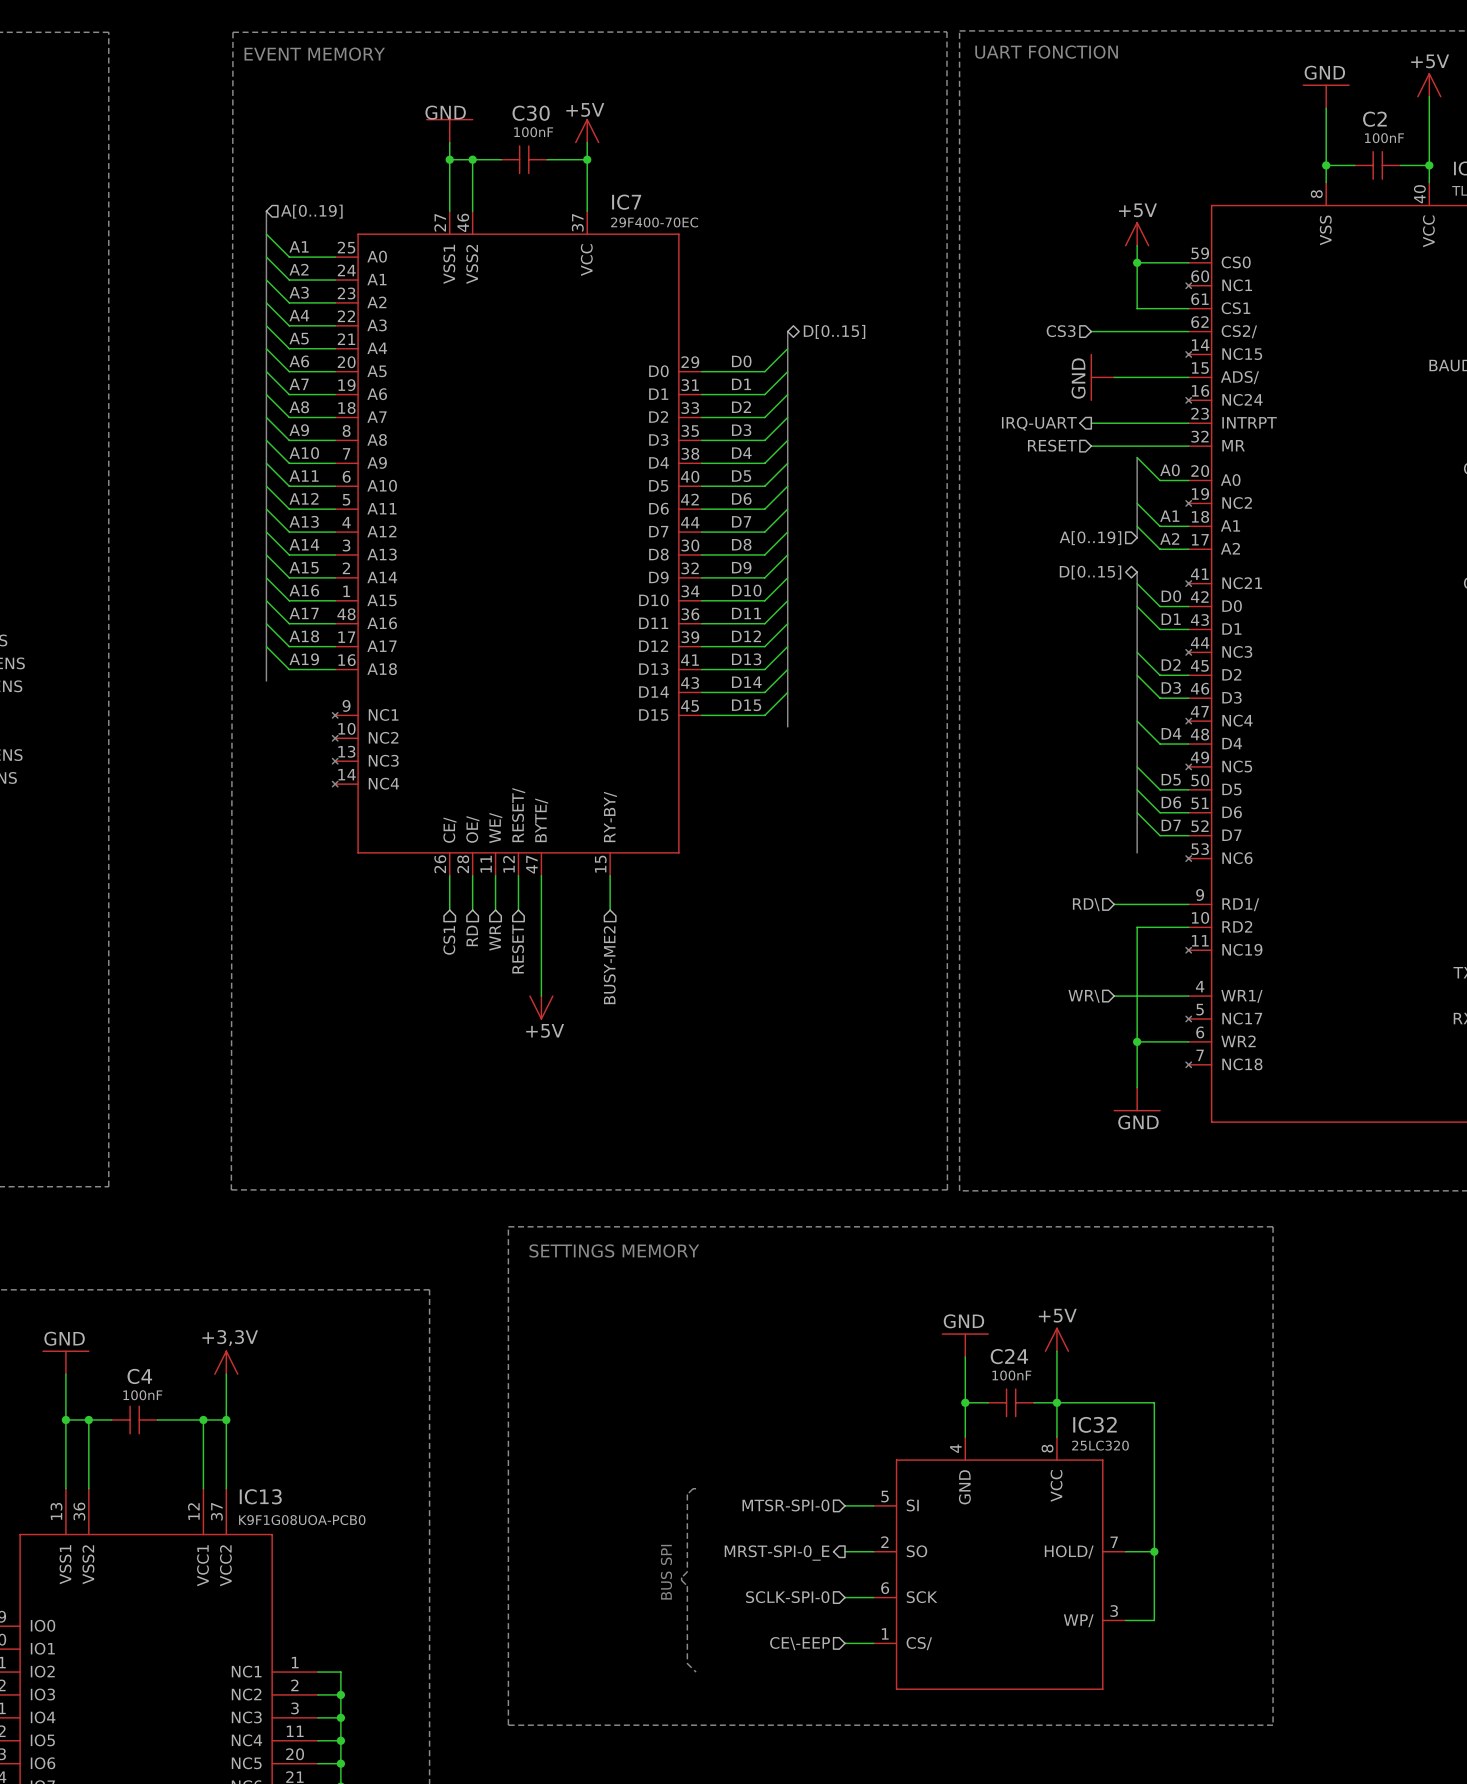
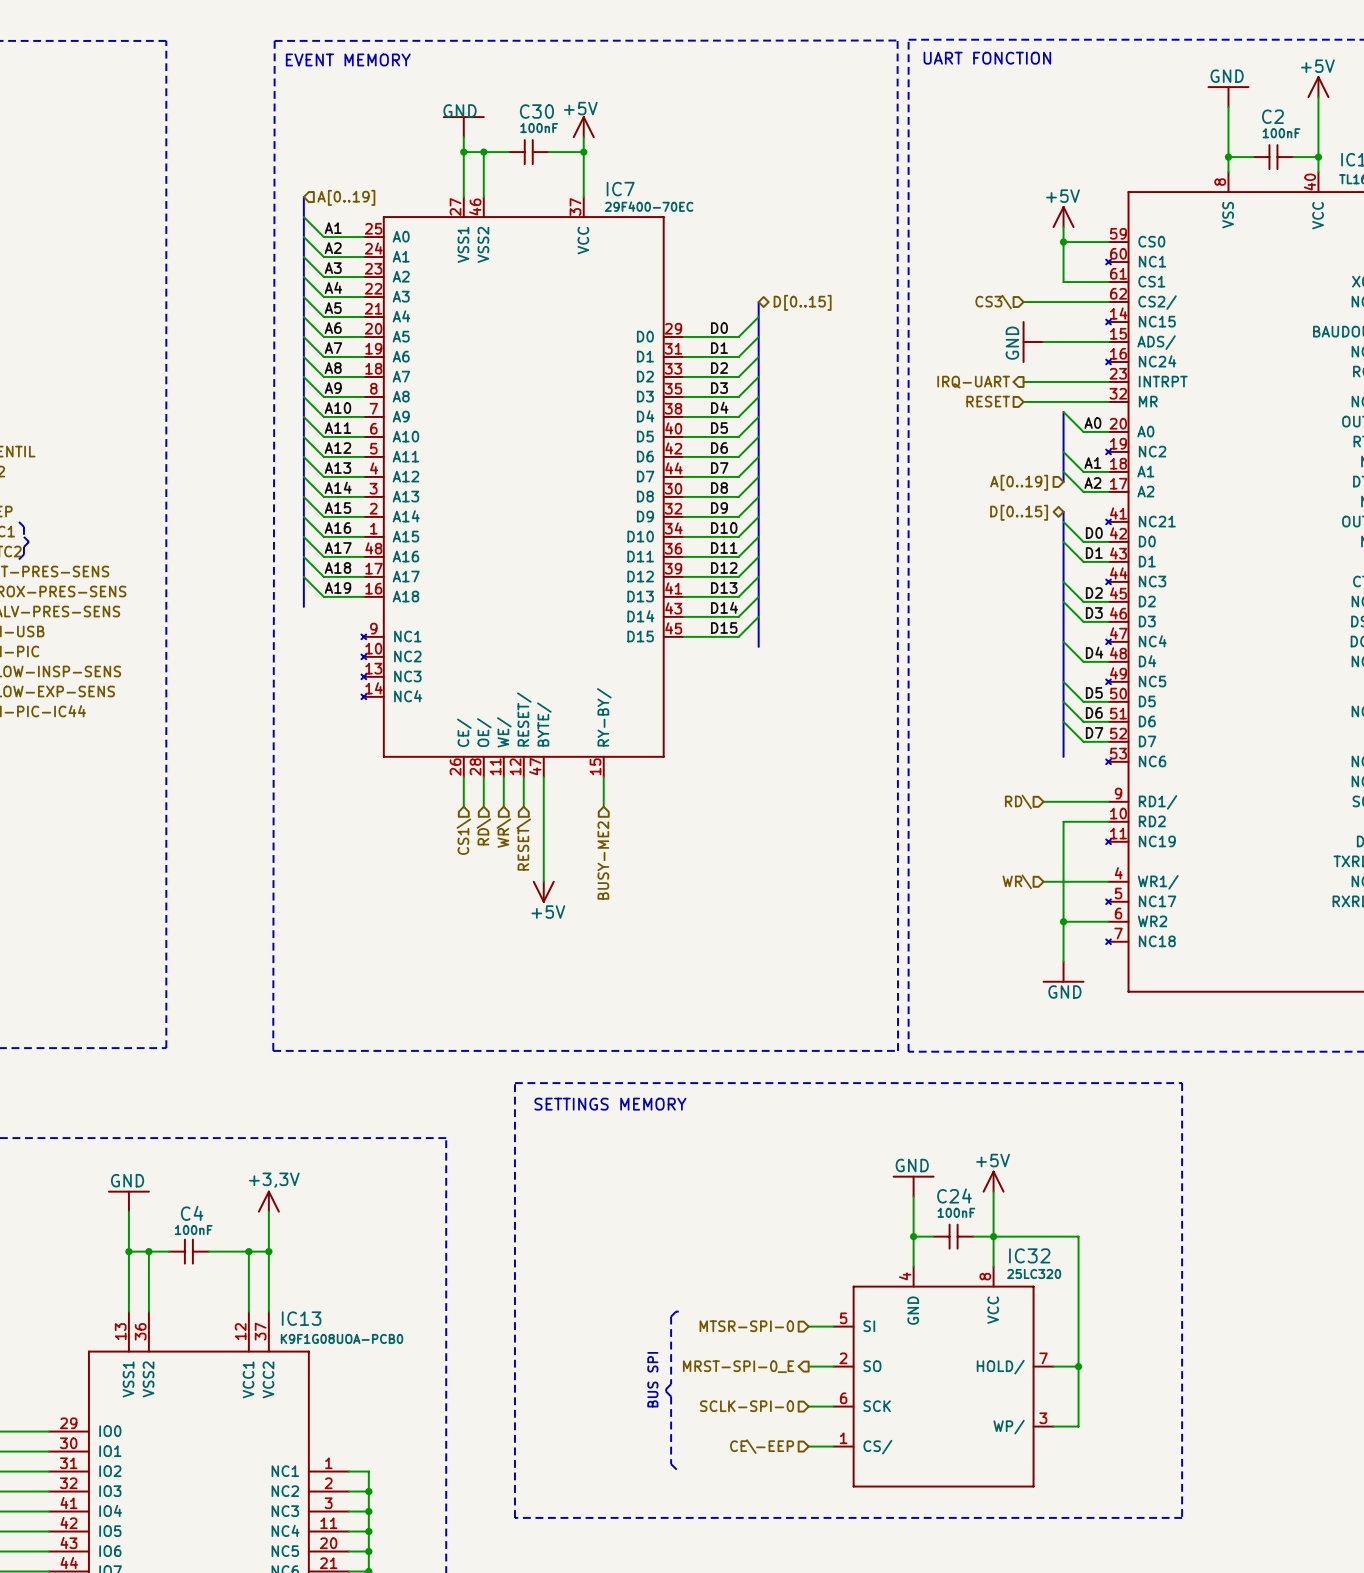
hierarchical label: CS3 (1061, 331) -> CS3\ (993, 302)
hierarchical label: RD (472, 935) -> RD\ (483, 831)
hierarchical label: WR (495, 937) -> WR\ (503, 833)
hierarchical label: CS1 (449, 940) -> CS1\ (463, 836)
hierarchical label: RESET (518, 949) -> RESET\ (523, 844)

